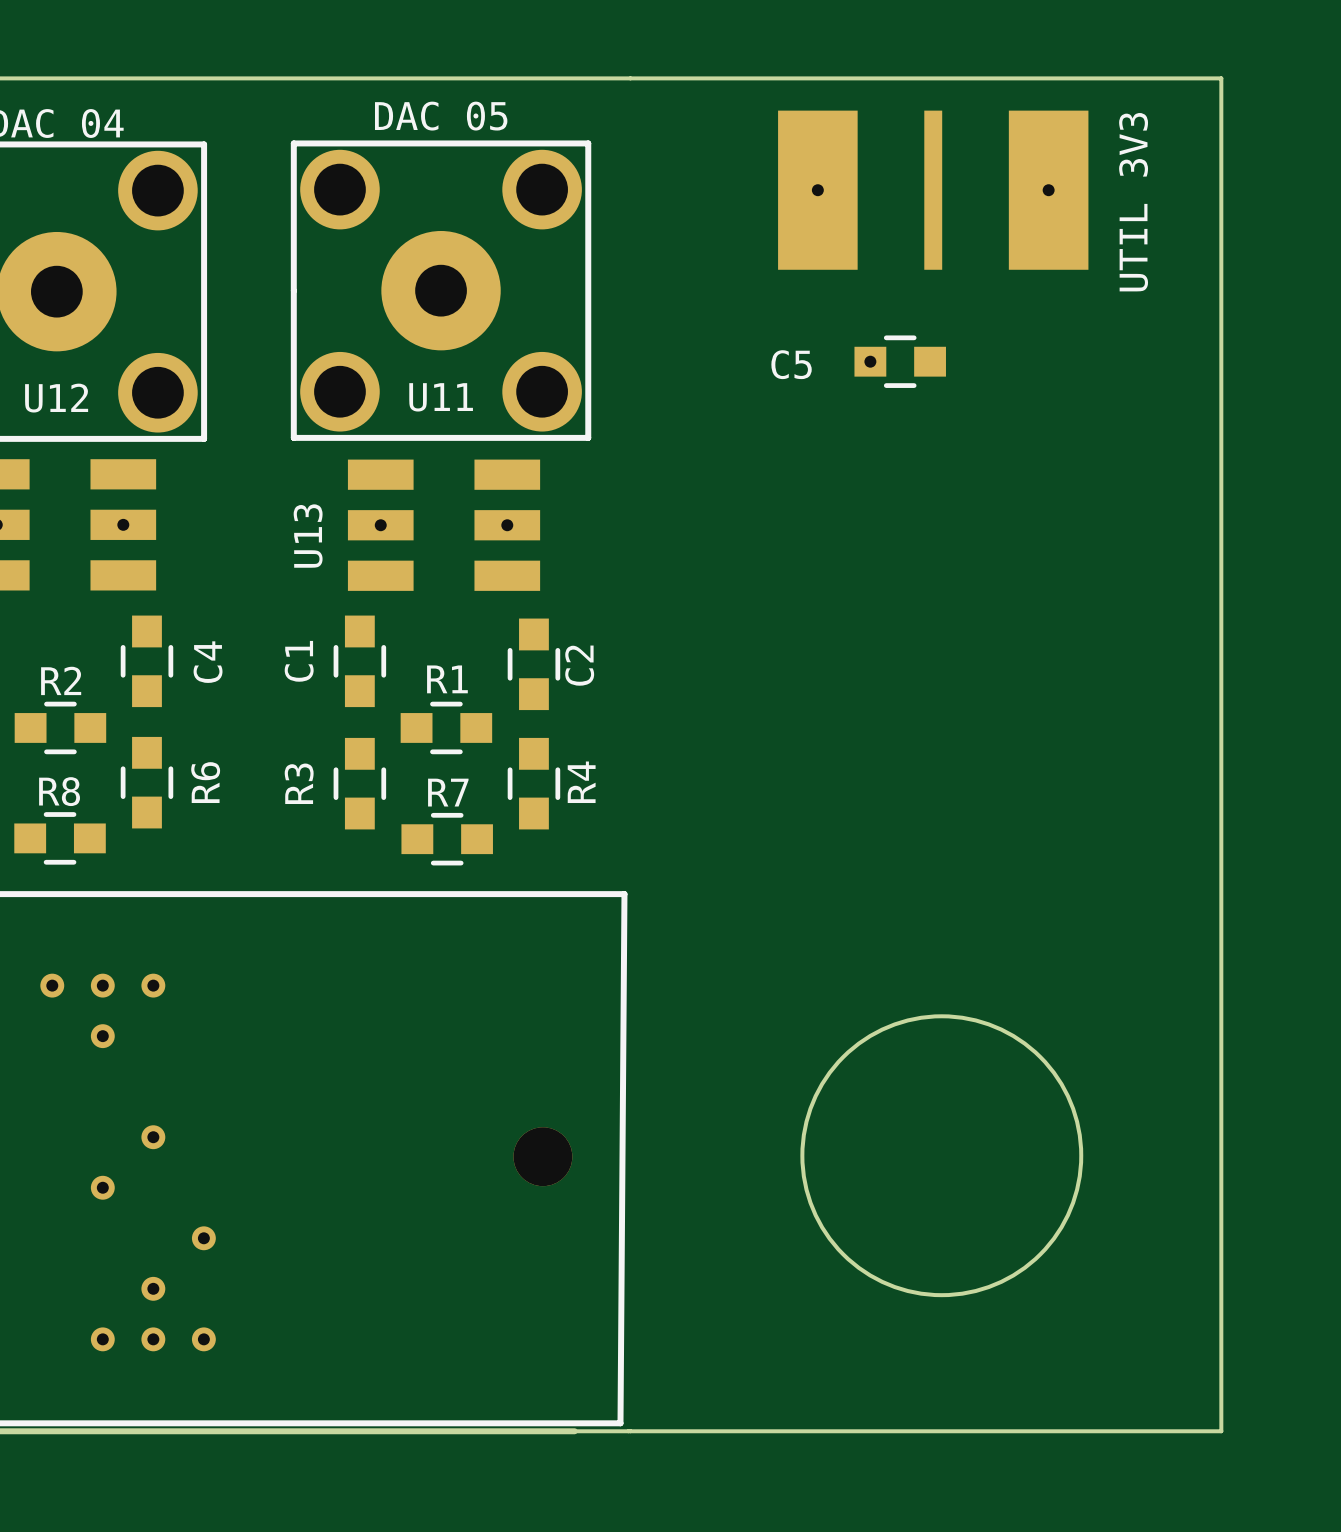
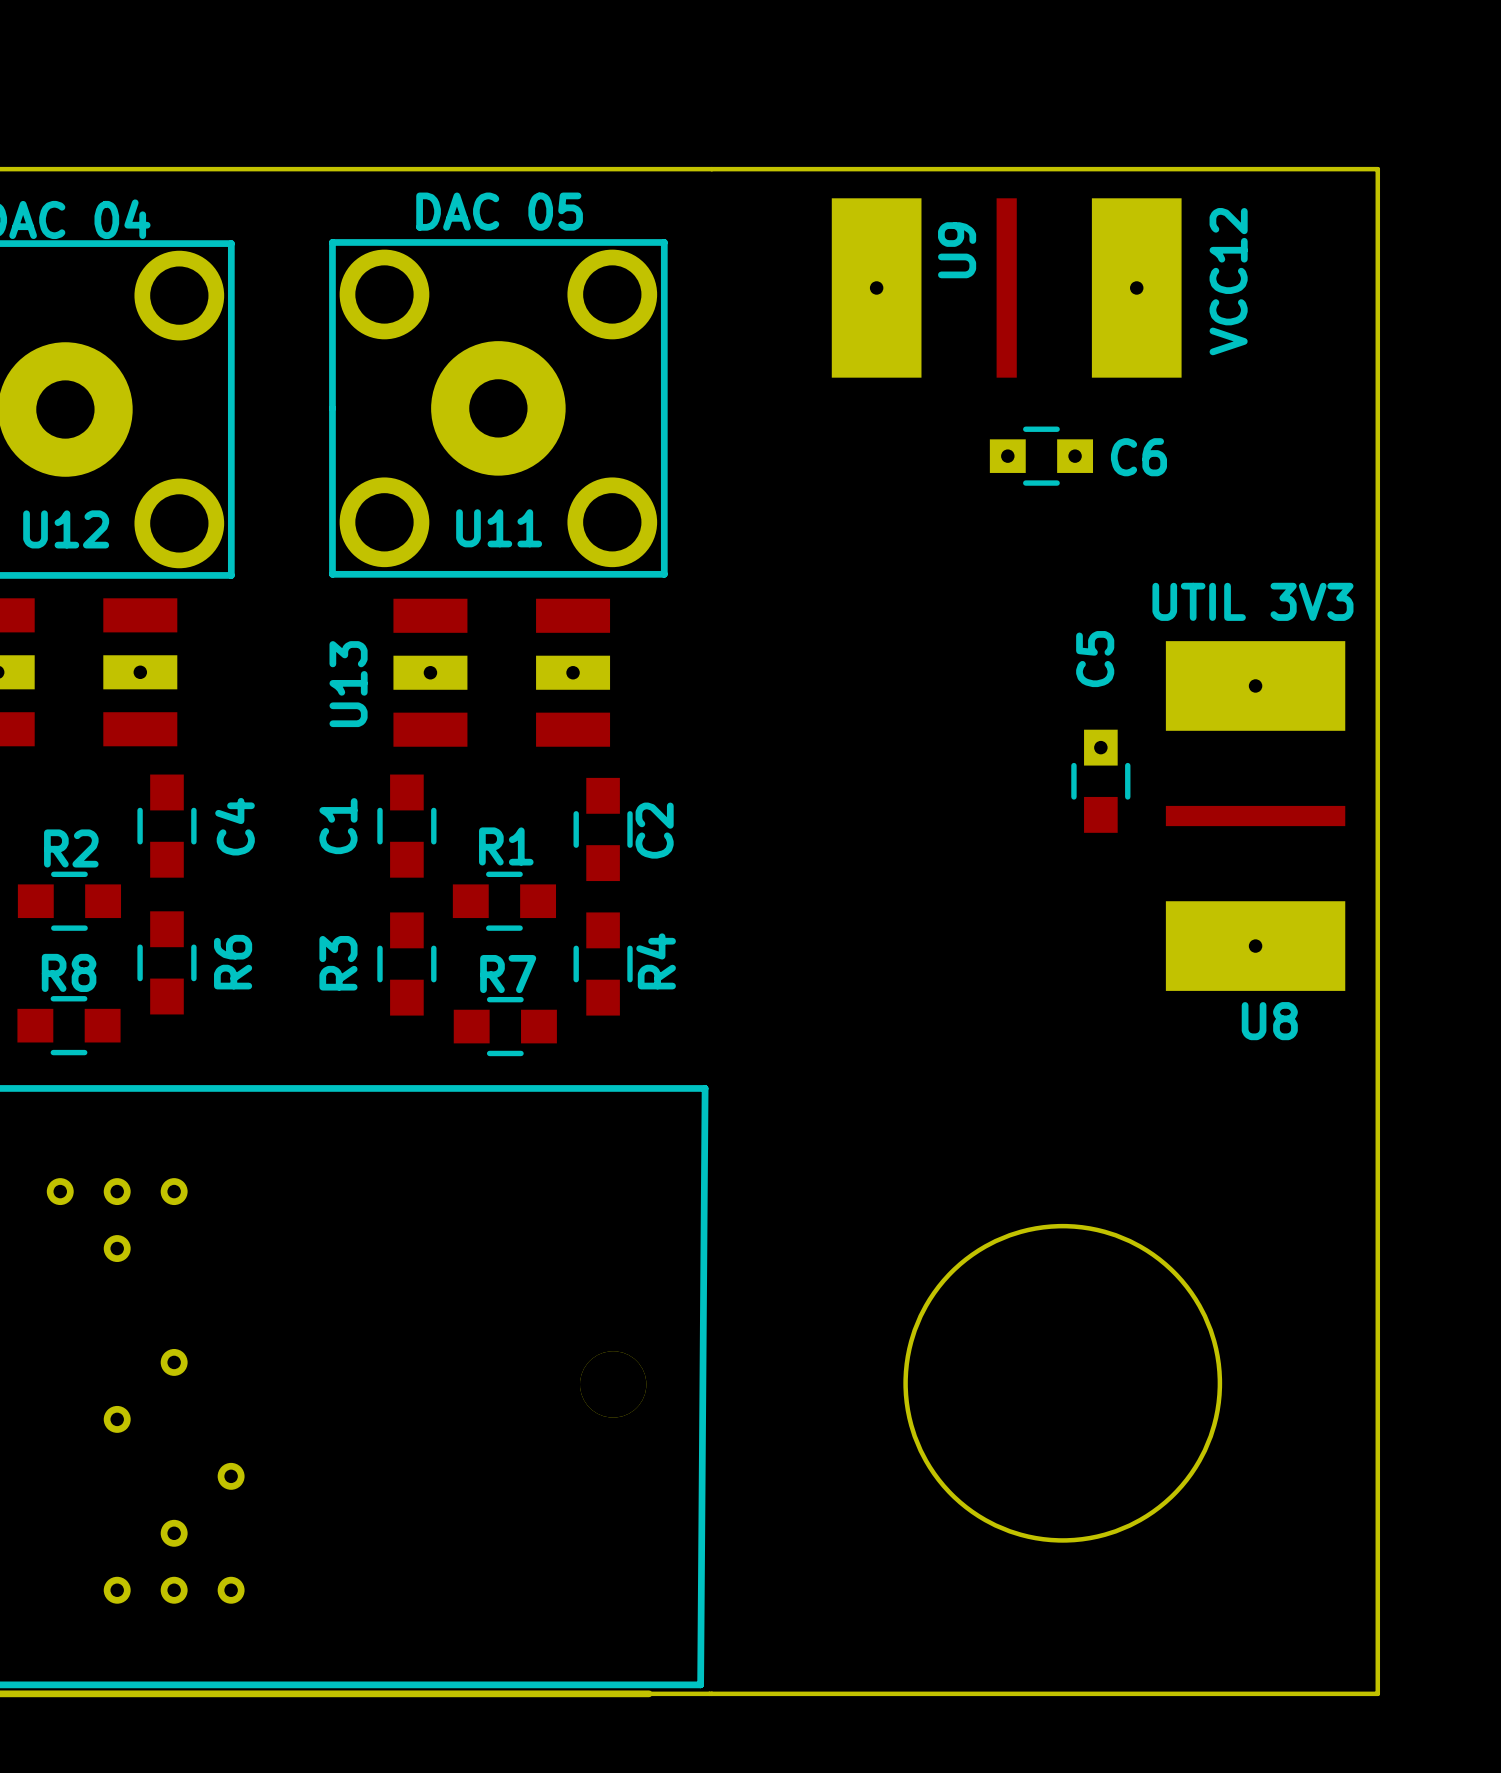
text: none -> VCC12 (1228, 281)
U9: none -> (1006, 287)
part: (933, 190) -> none
text rotation: 0° (1133, 202) -> 90° clockwise (1252, 601)
text position: UTIL 3V3 (1133, 202) -> UTIL 3V3 (1252, 601)
C6: none -> (1041, 456)
C5 rotation: 0° (900, 361) -> 90° clockwise (1100, 781)
C5 position: (900, 361) -> (1100, 781)
U8: none -> (1255, 816)

